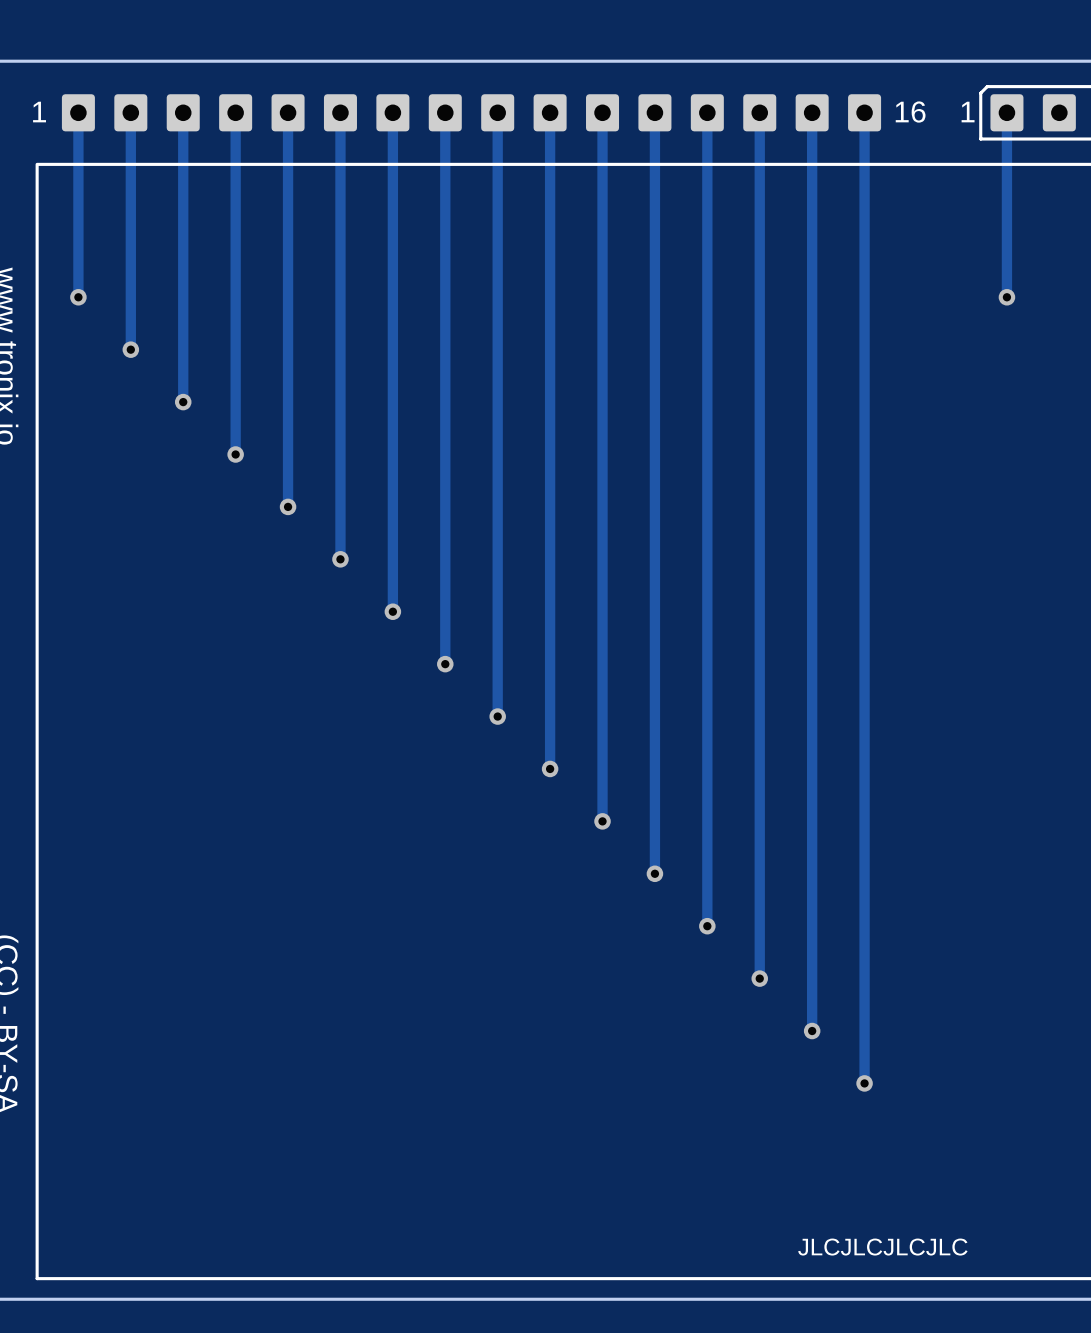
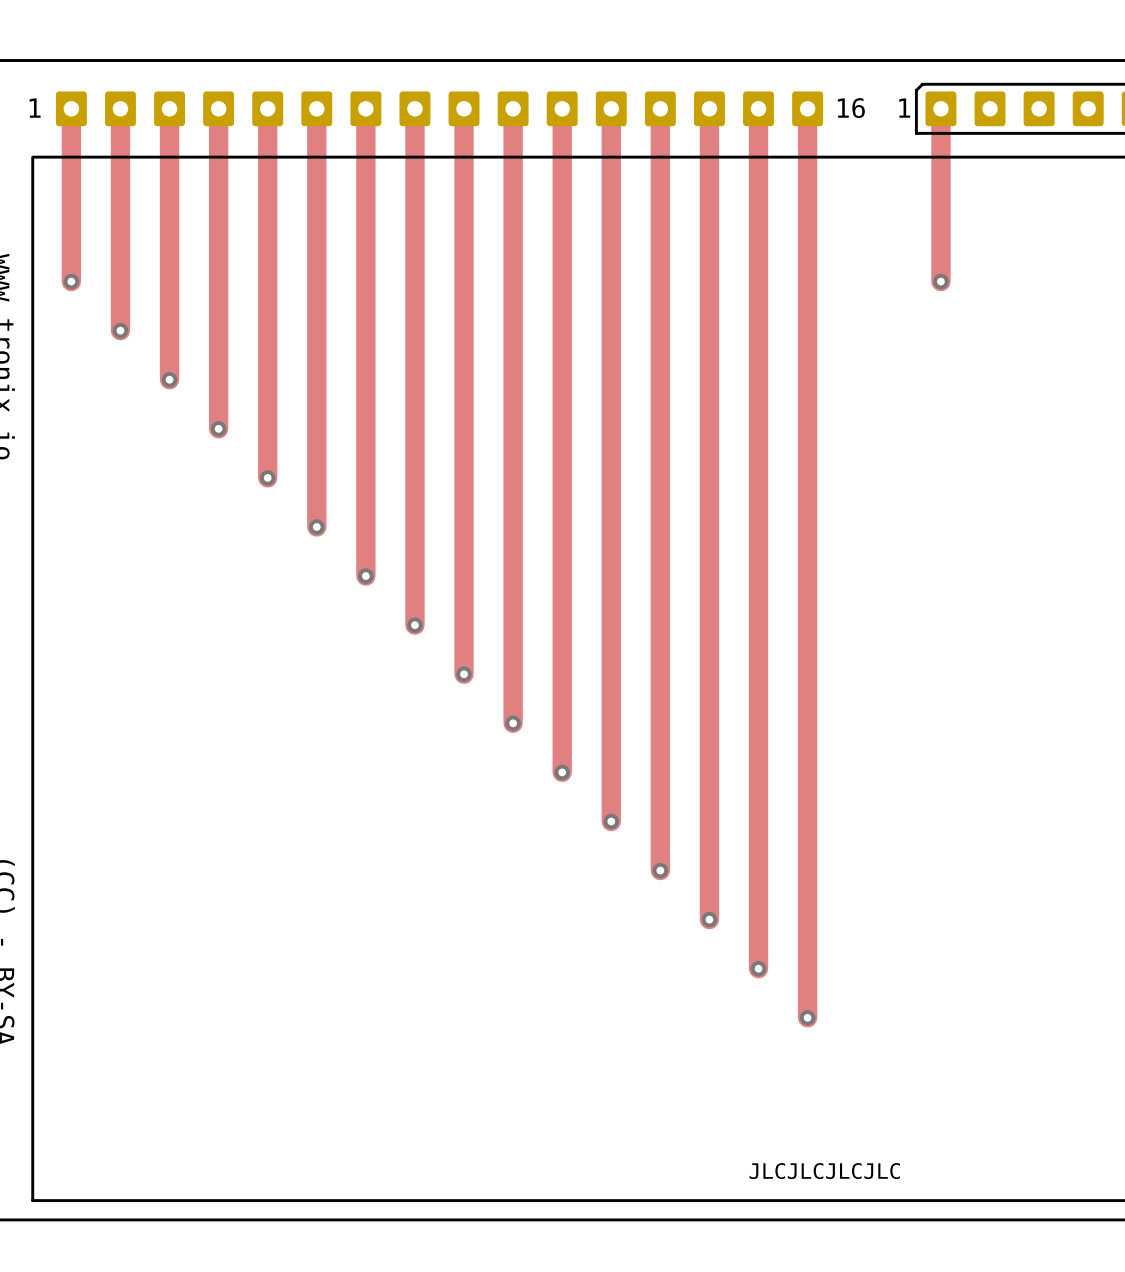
track width: thin (78, 112) (78, 297) -> thick (71, 108) (71, 281)
track width: thin (130, 112) (130, 349) -> thick (120, 108) (120, 330)
track width: thin (183, 112) (183, 402) -> thick (169, 108) (169, 379)
track width: thin (235, 112) (235, 454) -> thick (218, 108) (218, 428)
track width: thin (288, 112) (288, 506) -> thick (267, 108) (267, 477)
track width: thin (340, 112) (340, 559) -> thick (316, 108) (316, 526)
track width: thin (392, 112) (392, 611) -> thick (365, 108) (365, 576)
track width: thin (445, 112) (445, 664) -> thick (414, 108) (414, 625)
track width: thin (497, 112) (497, 716) -> thick (464, 108) (464, 674)
track width: thin (550, 112) (550, 768) -> thick (513, 108) (513, 723)
track width: thin (602, 112) (602, 821) -> thick (562, 108) (562, 772)
track width: thin (654, 112) (654, 873) -> thick (611, 108) (611, 821)
track width: thin (707, 112) (707, 926) -> thick (660, 108) (660, 870)
track width: thin (759, 112) (759, 978) -> thick (709, 108) (709, 919)
track width: thin (812, 112) (812, 1031) -> thick (758, 108) (758, 968)
track width: thin (864, 112) (864, 1083) -> thick (807, 108) (807, 1017)
track width: thin (1006, 112) (1006, 297) -> thick (940, 108) (940, 281)

